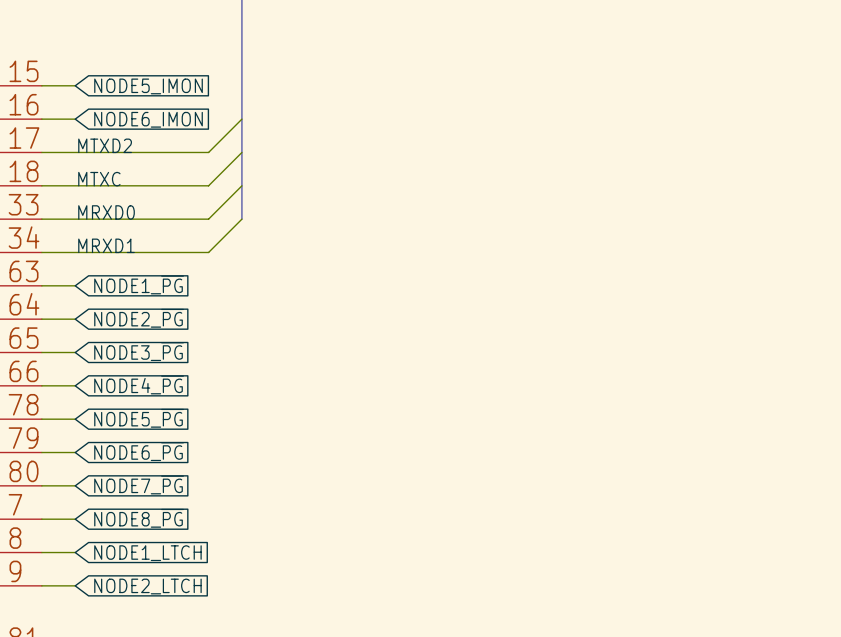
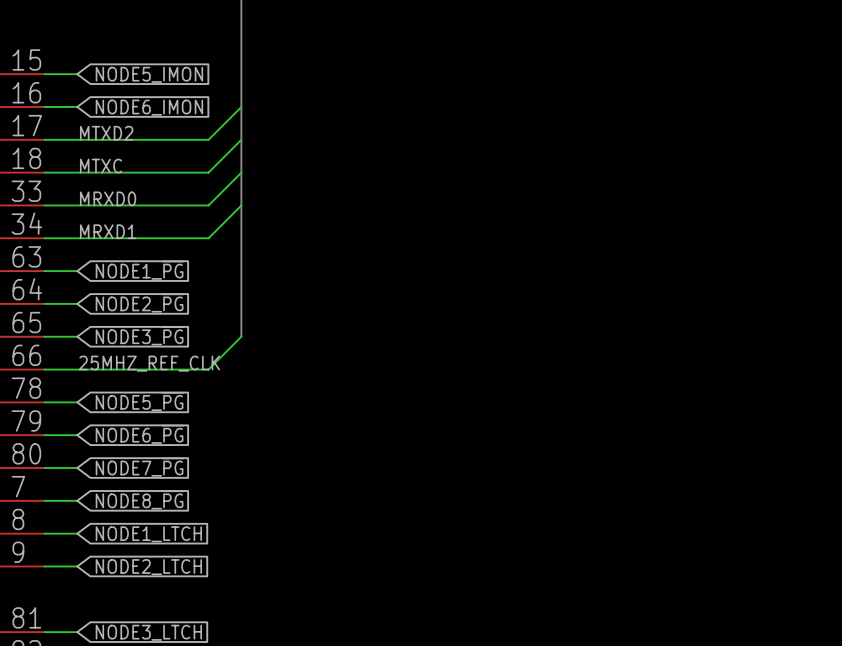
bus: none -> (241, 205) (241, 336)
wire: none -> (241, 336) (208, 369) (77, 369)
label: none -> 25MHZ_REF_CLK (149, 363)
global label: NODE4_~{PG} (139, 384) -> none

